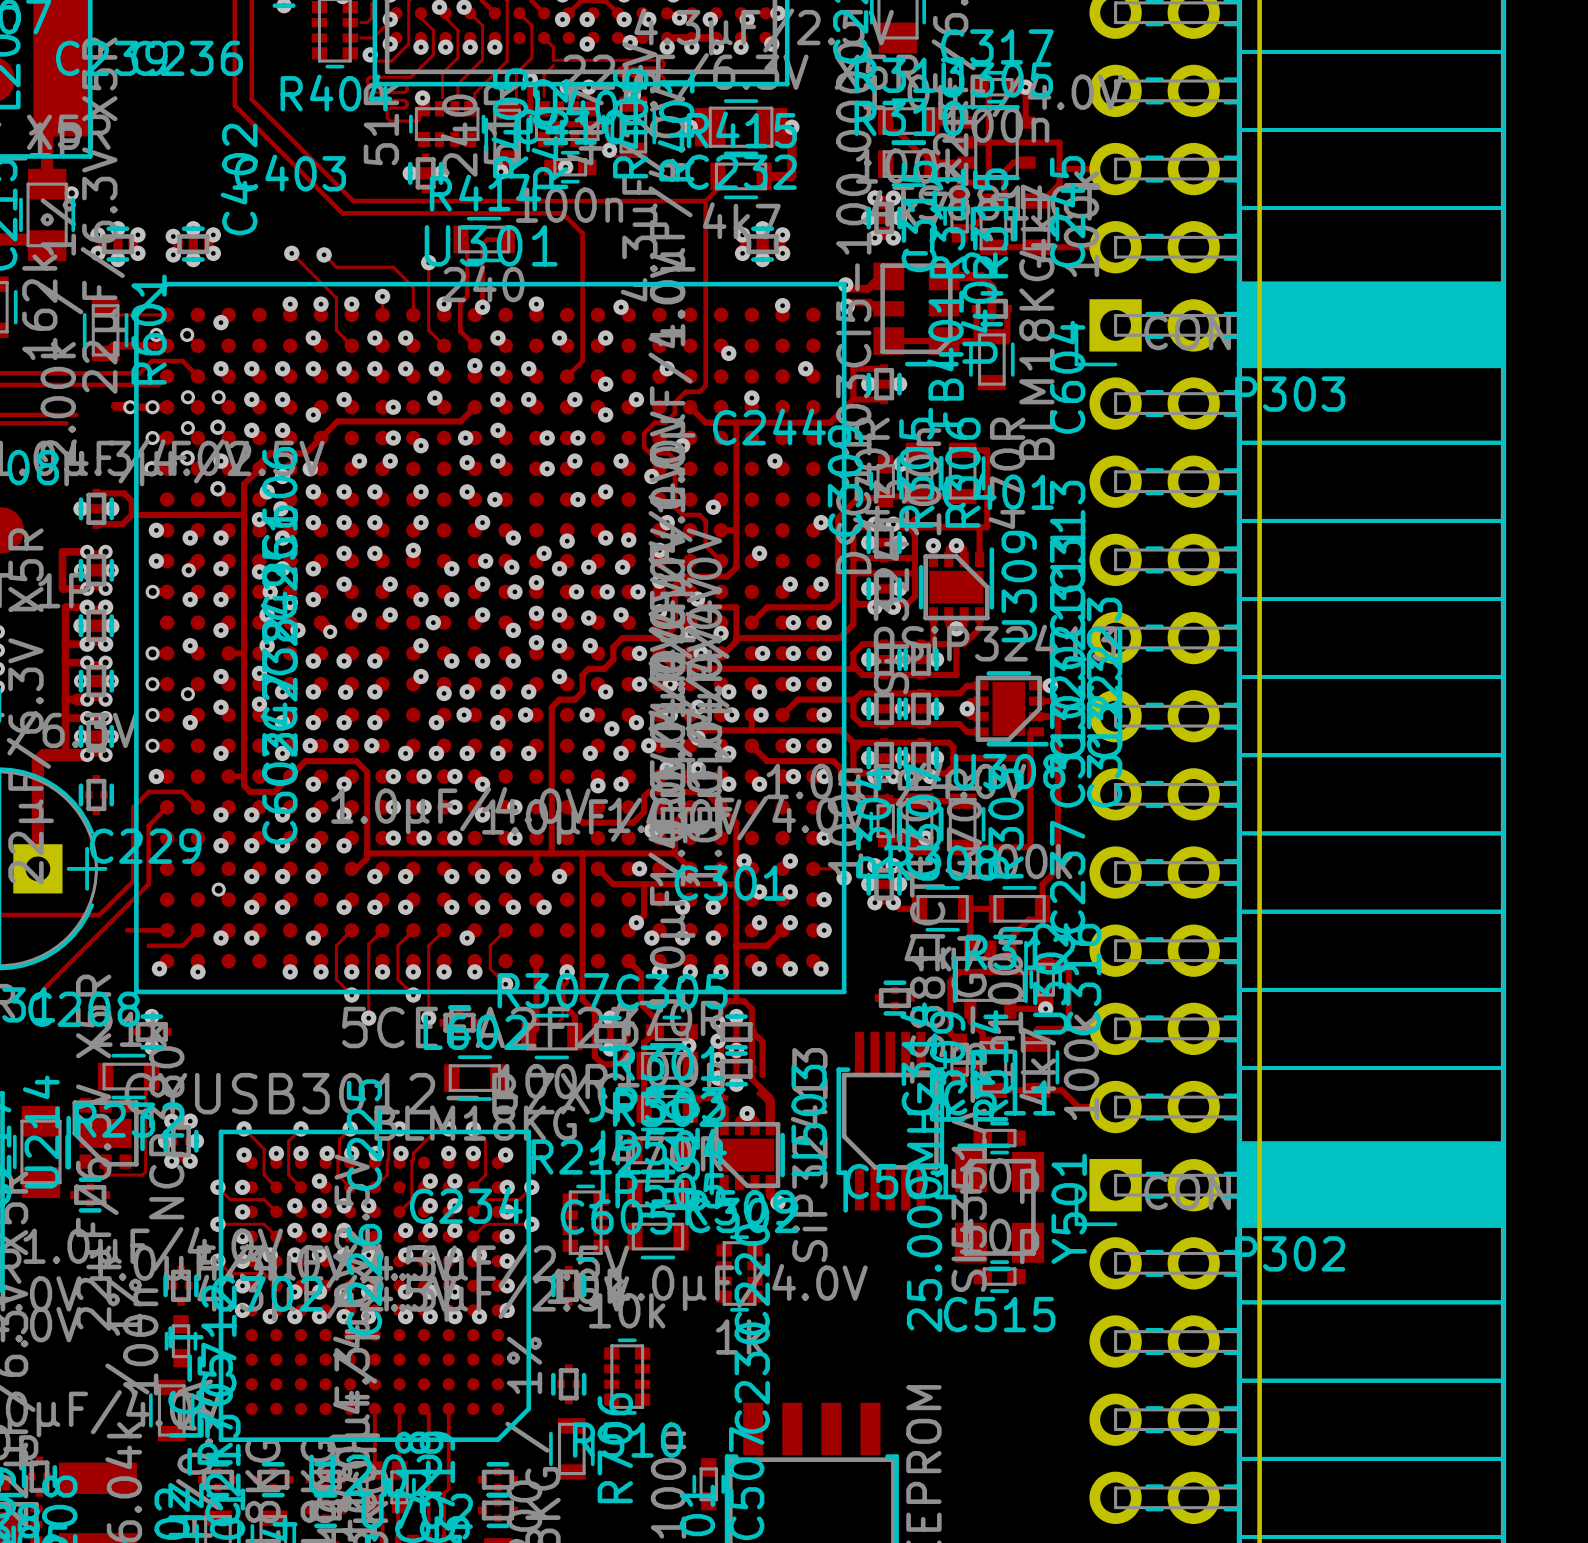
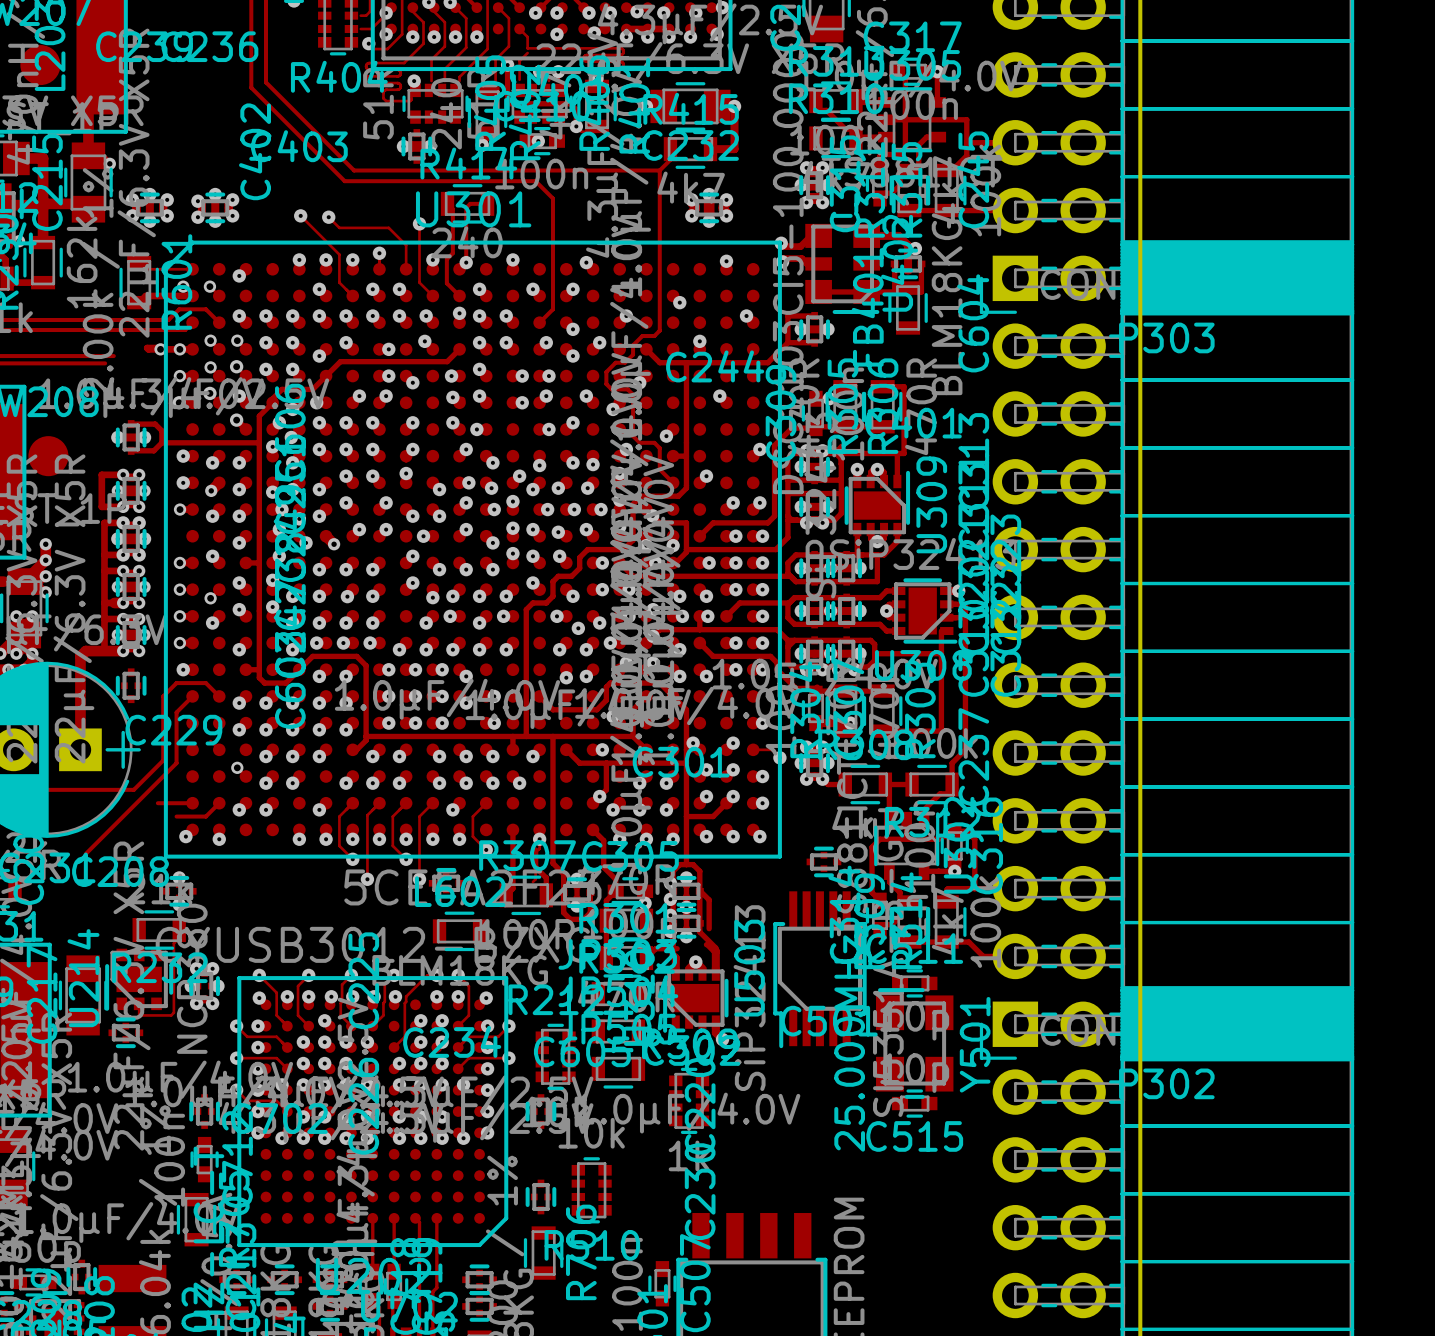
via: none -> (915, 248)

